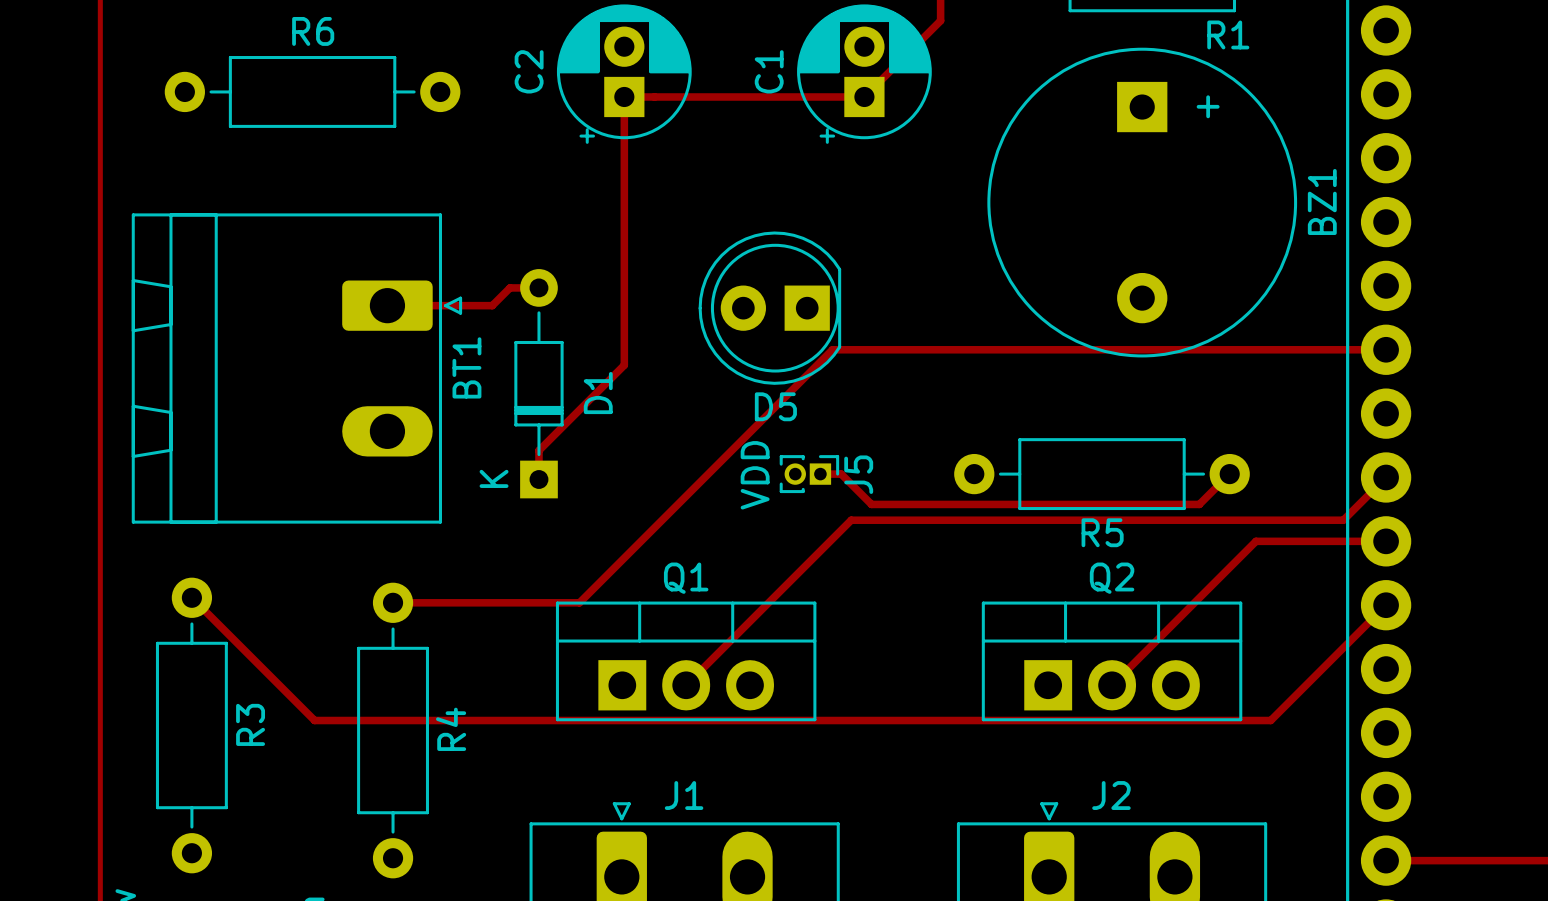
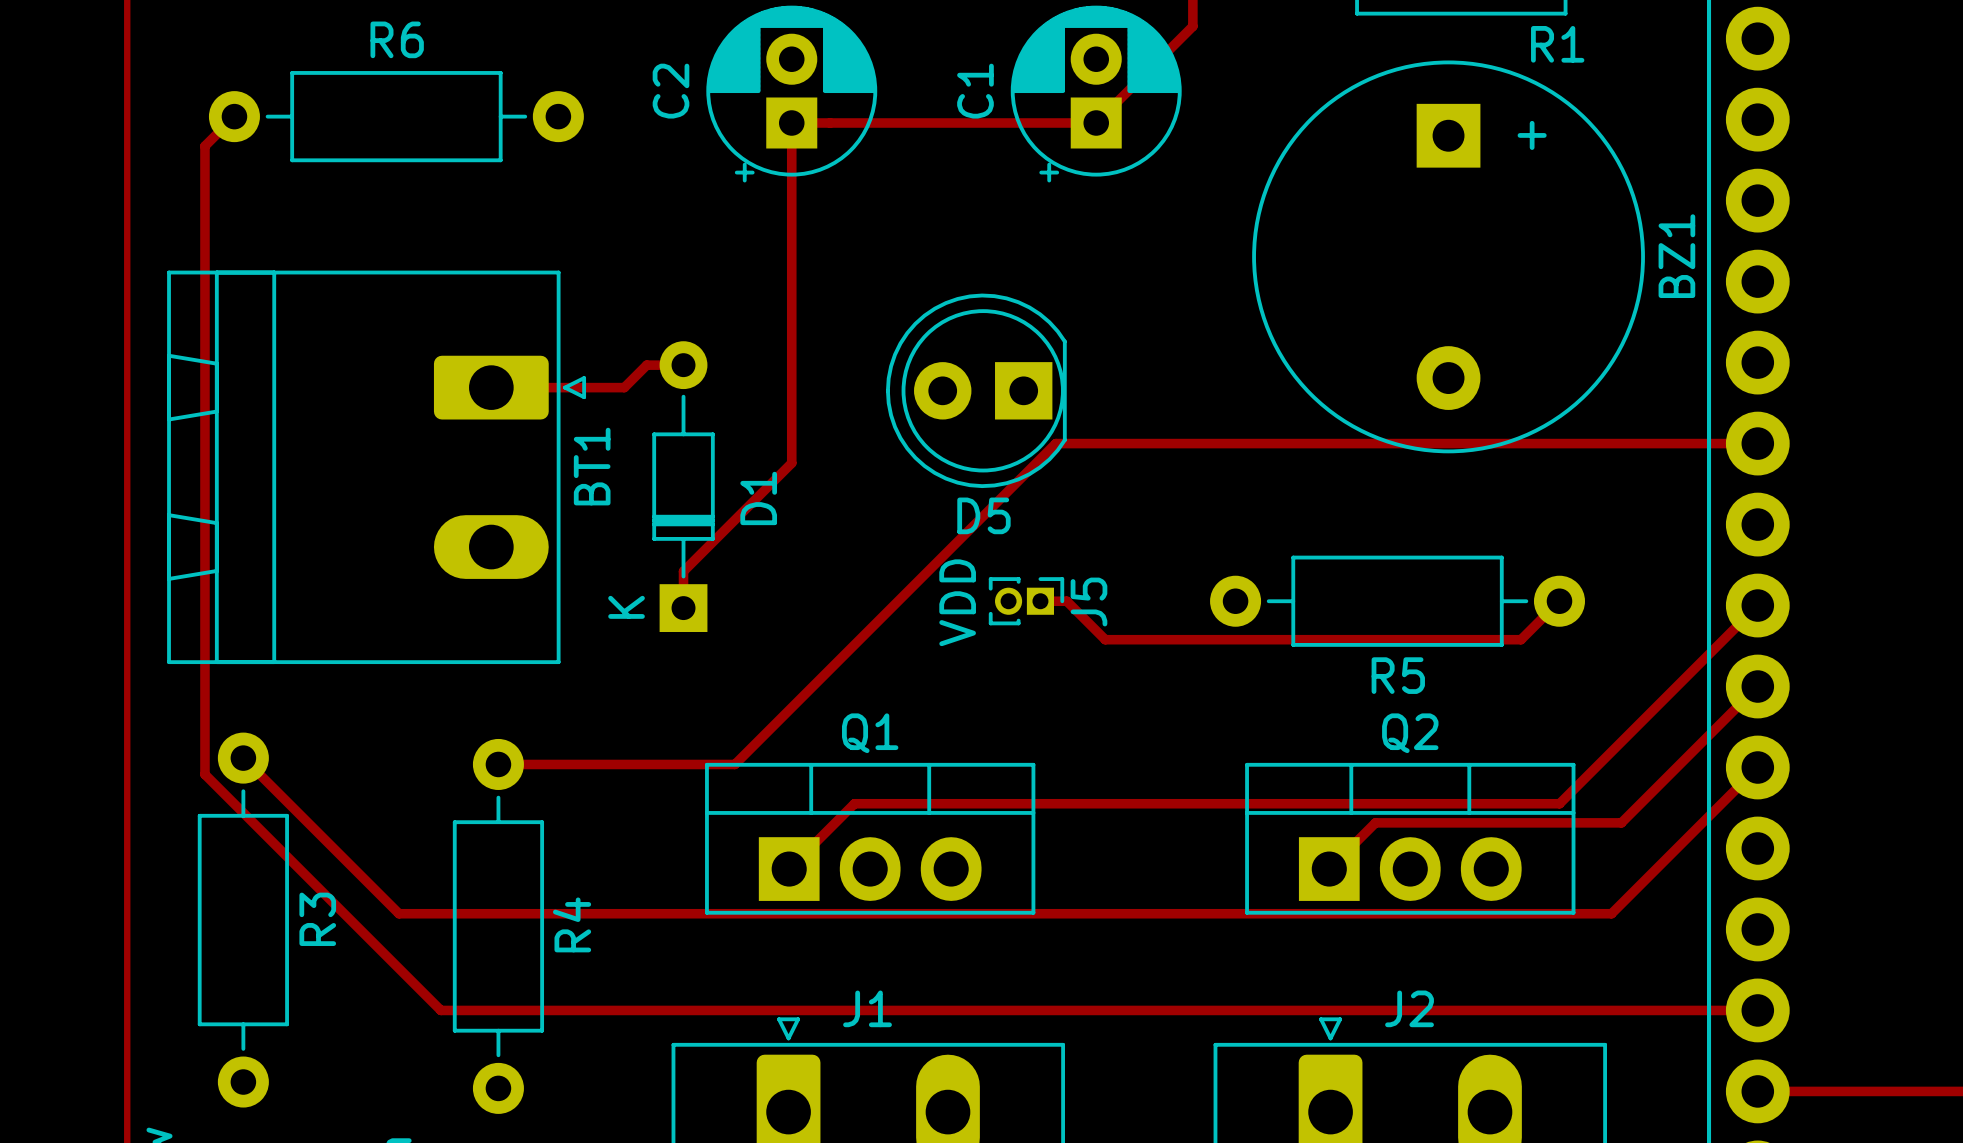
track: none -> (234, 116) (204, 146) (204, 774) (440, 1010) (1757, 1010)
track: (1343, 520) (851, 520) (686, 685) -> (1703, 659) (1559, 803) (854, 803) (789, 869)
track: (1386, 541) (1255, 541) (1112, 685) -> (1757, 686) (1621, 822) (1375, 822) (1329, 869)

